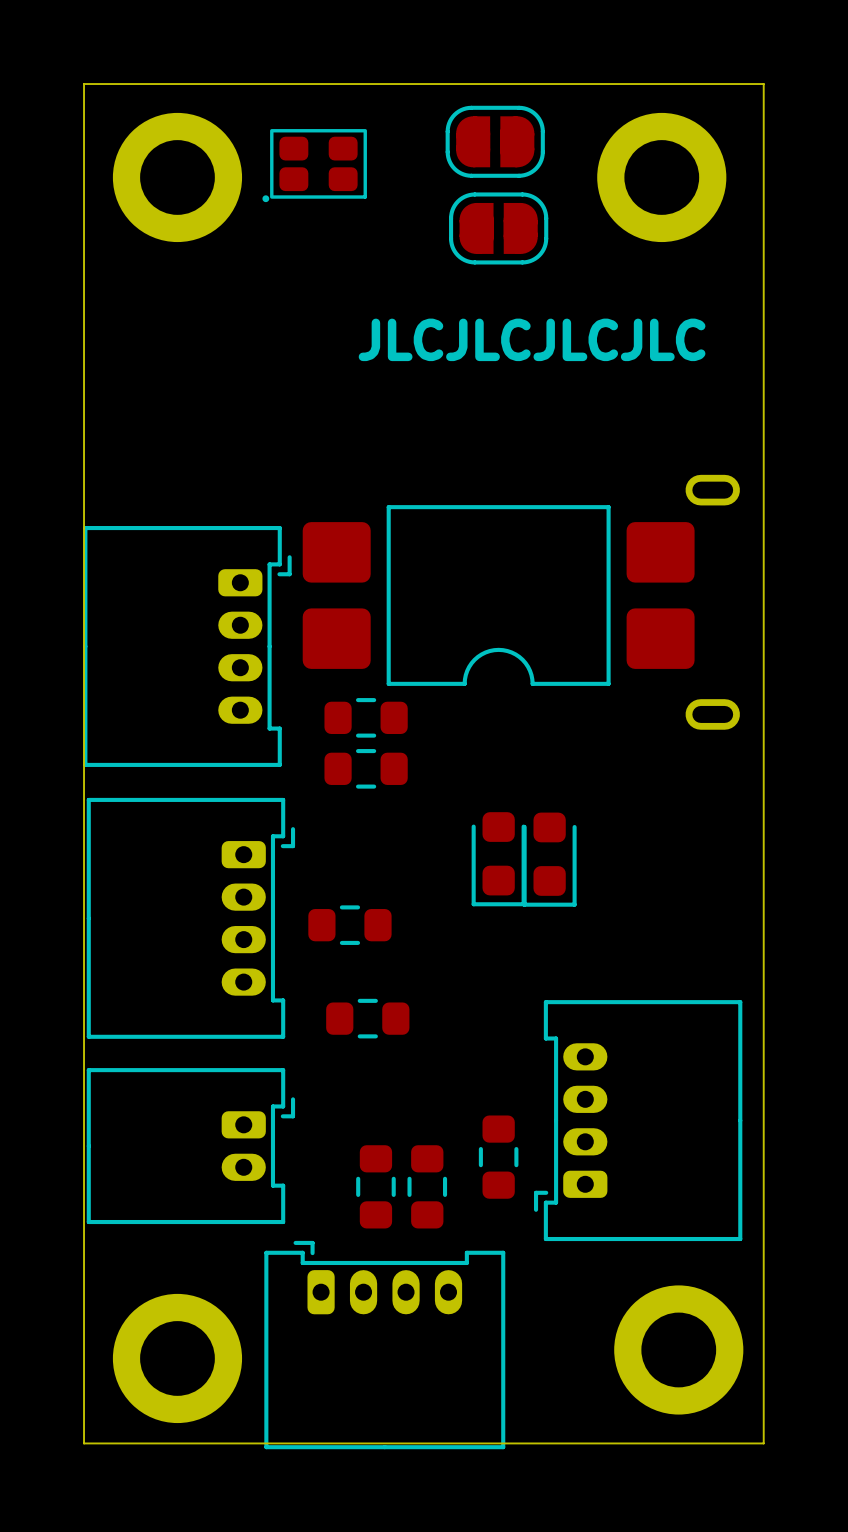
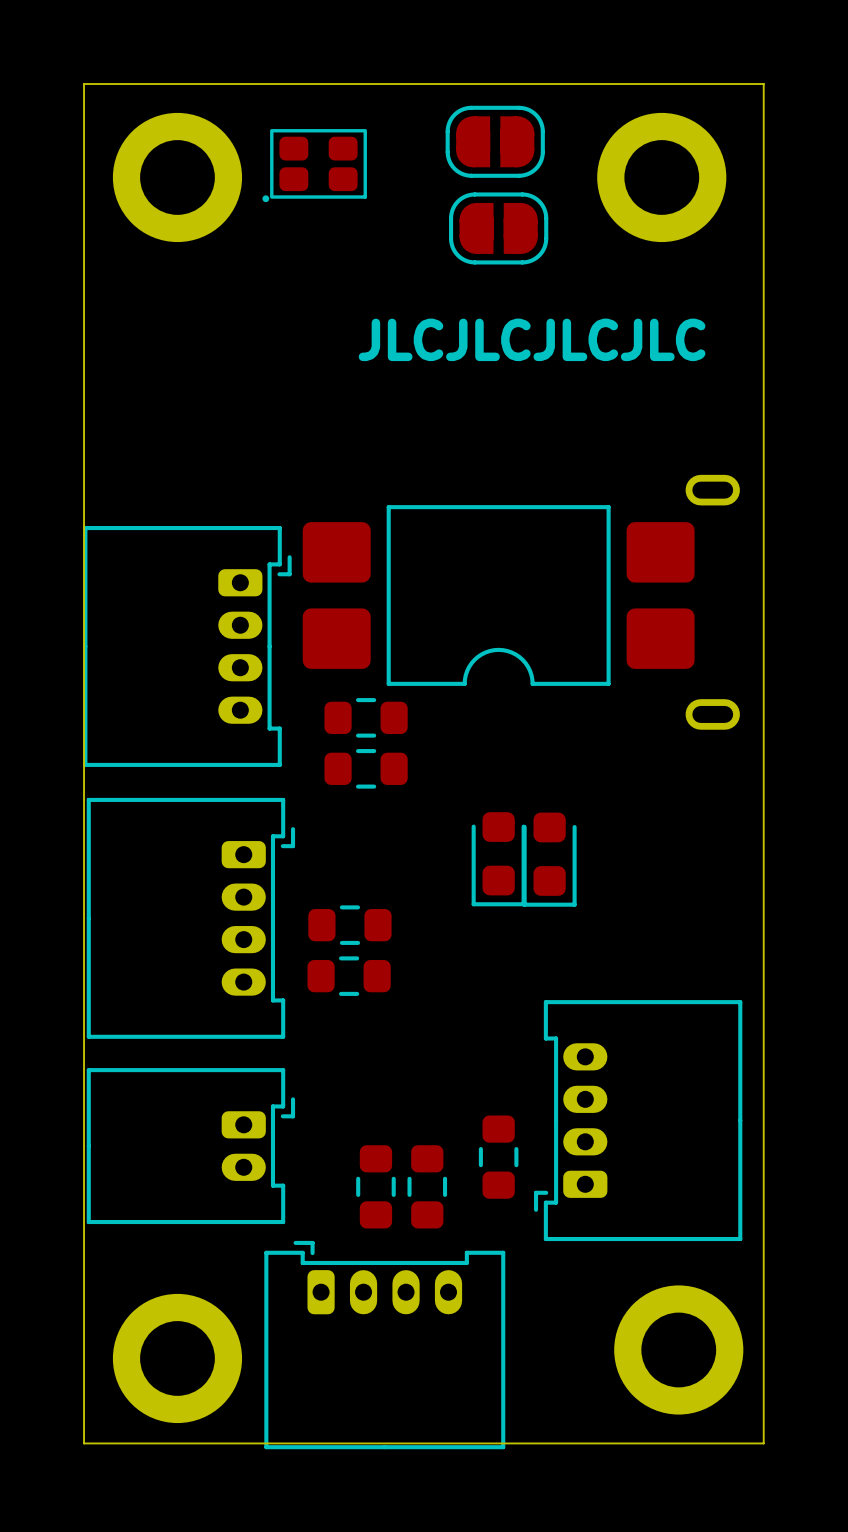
part position: (367, 1018) -> (349, 976)

